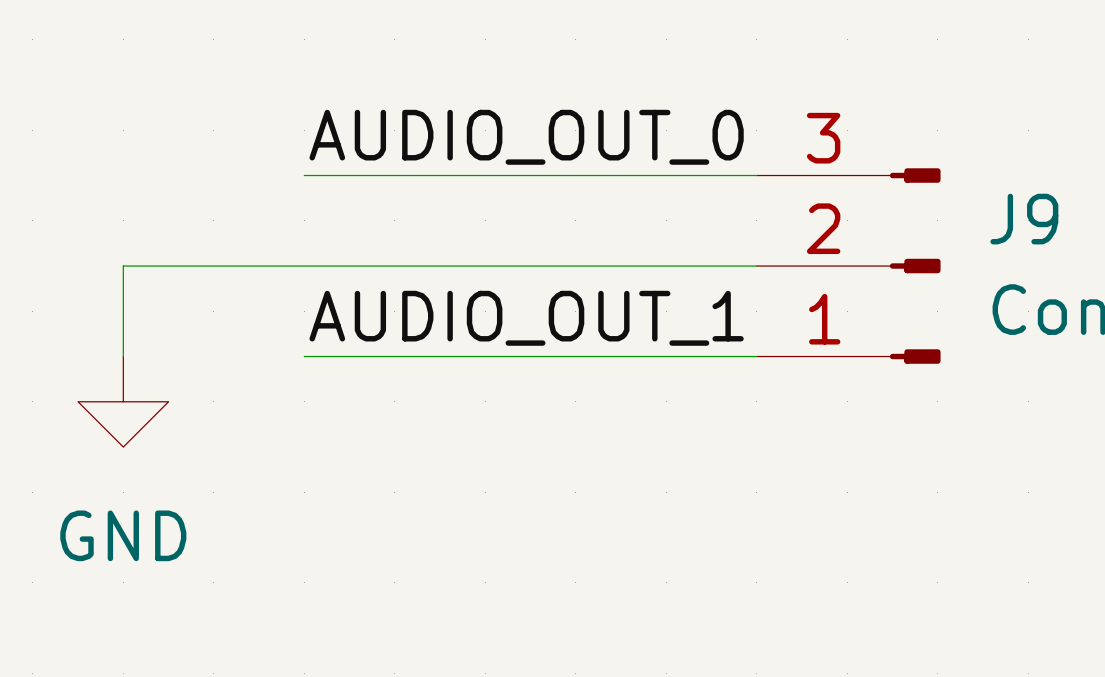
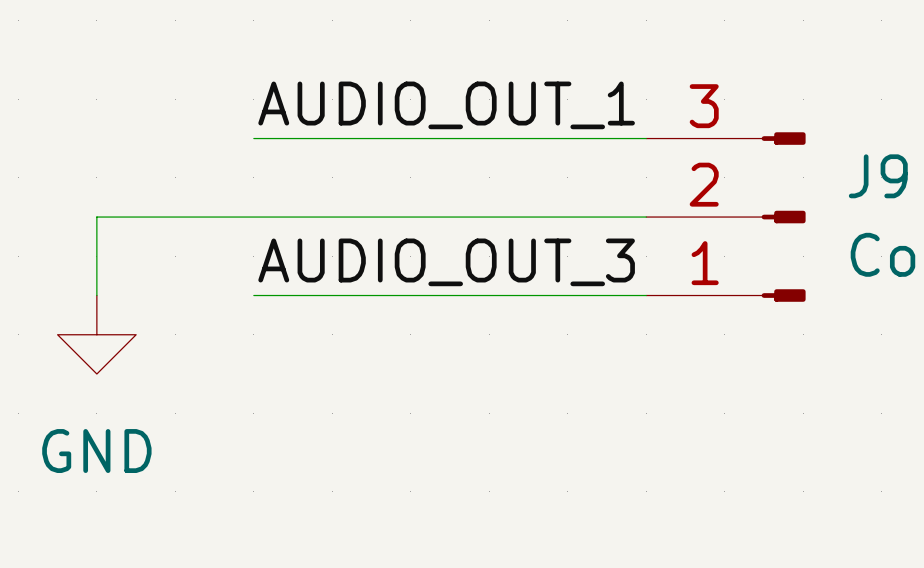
label: AUDIO_OUT_0 (526, 137) -> AUDIO_OUT_1 (446, 105)
label: AUDIO_OUT_1 (526, 318) -> AUDIO_OUT_3 (446, 262)

